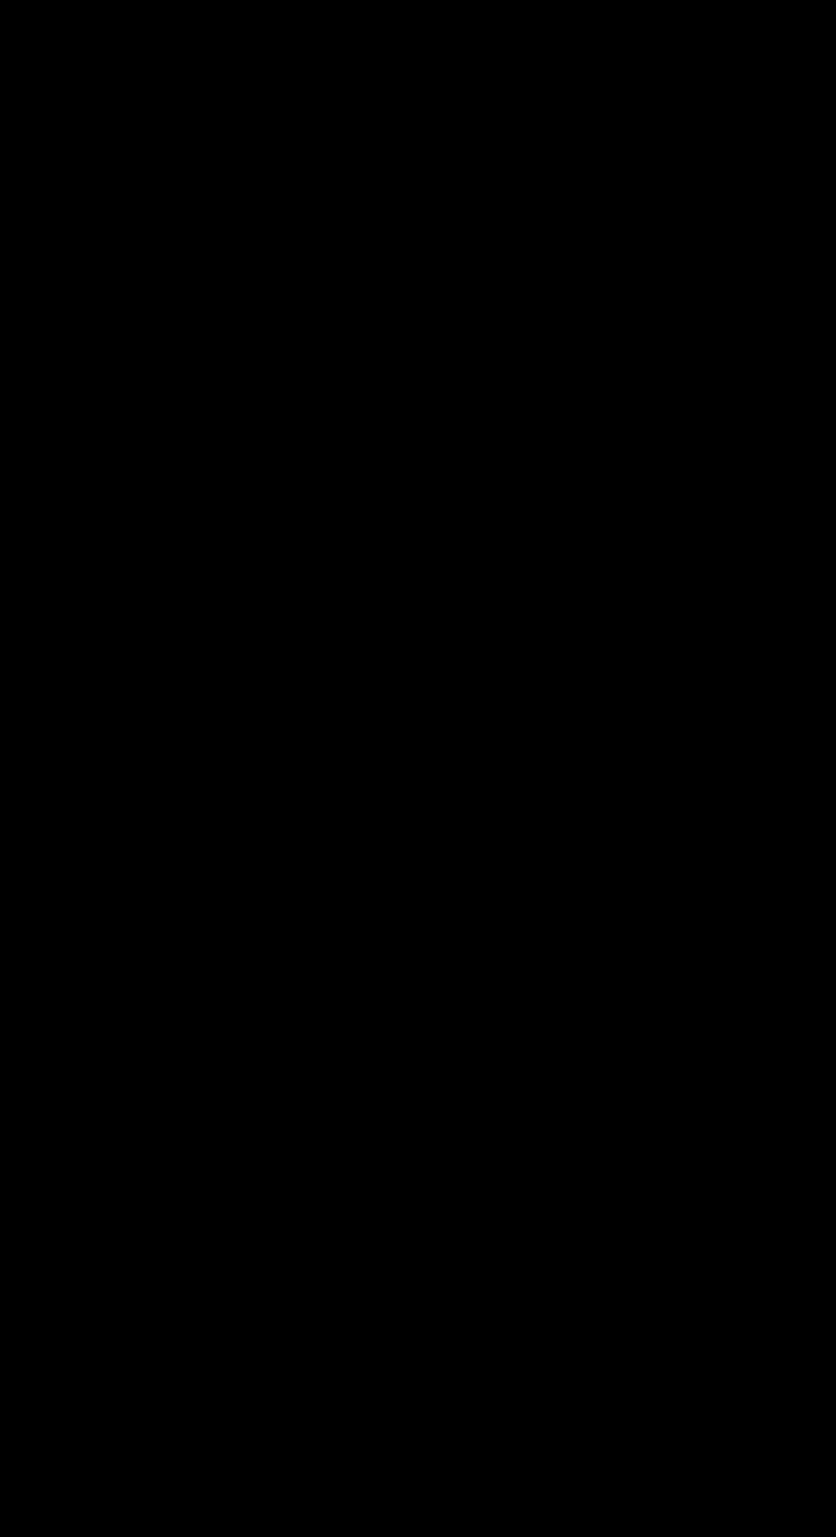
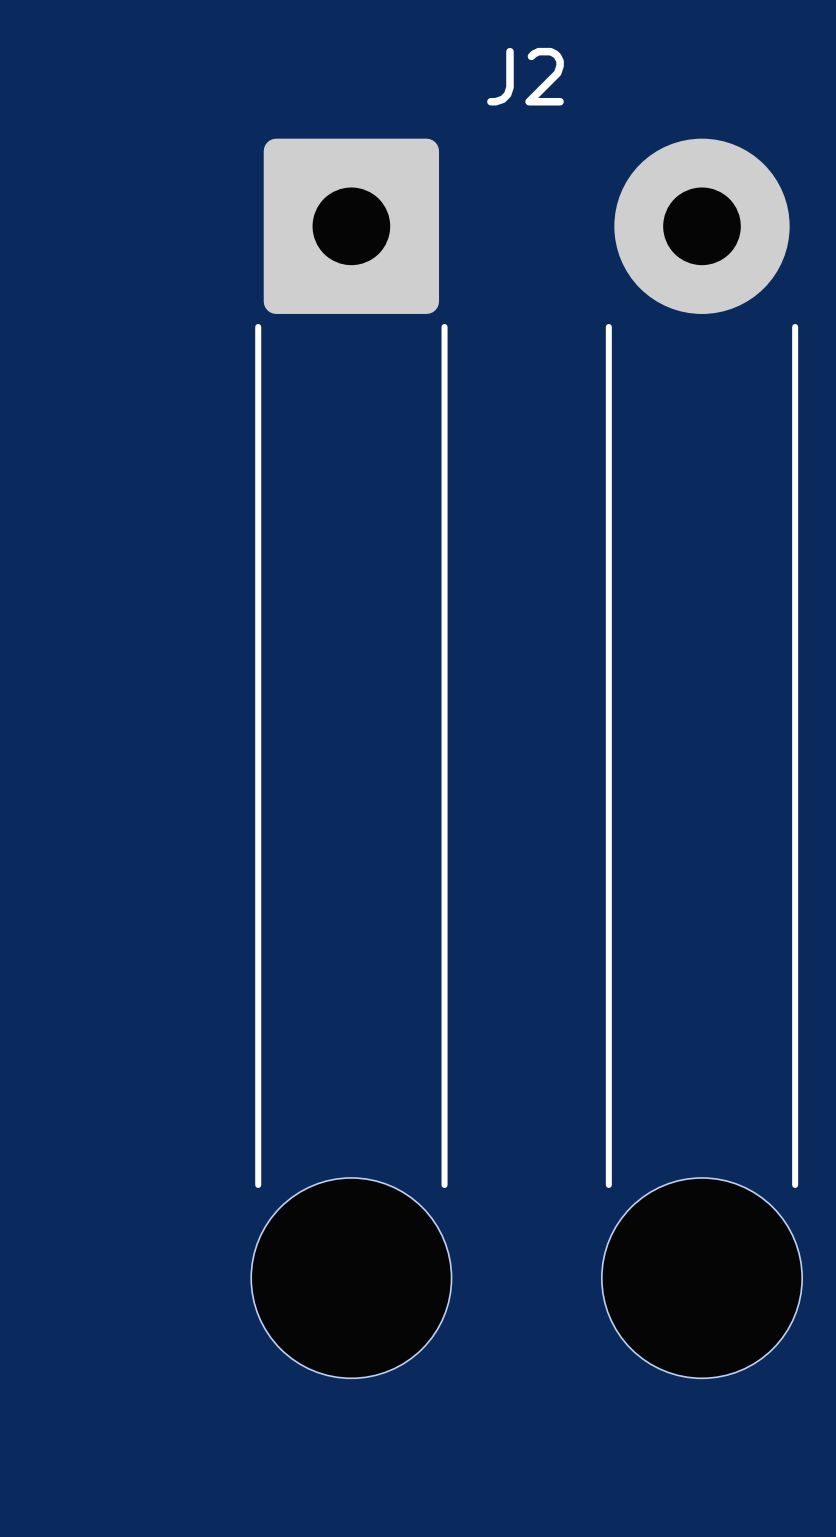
J2: none -> (526, 758)

